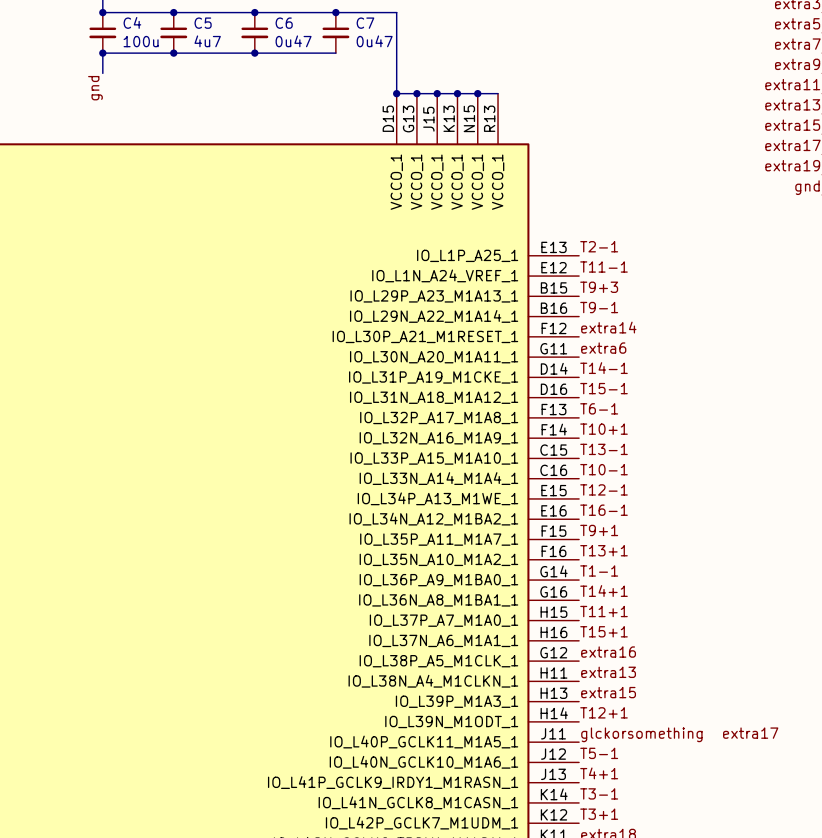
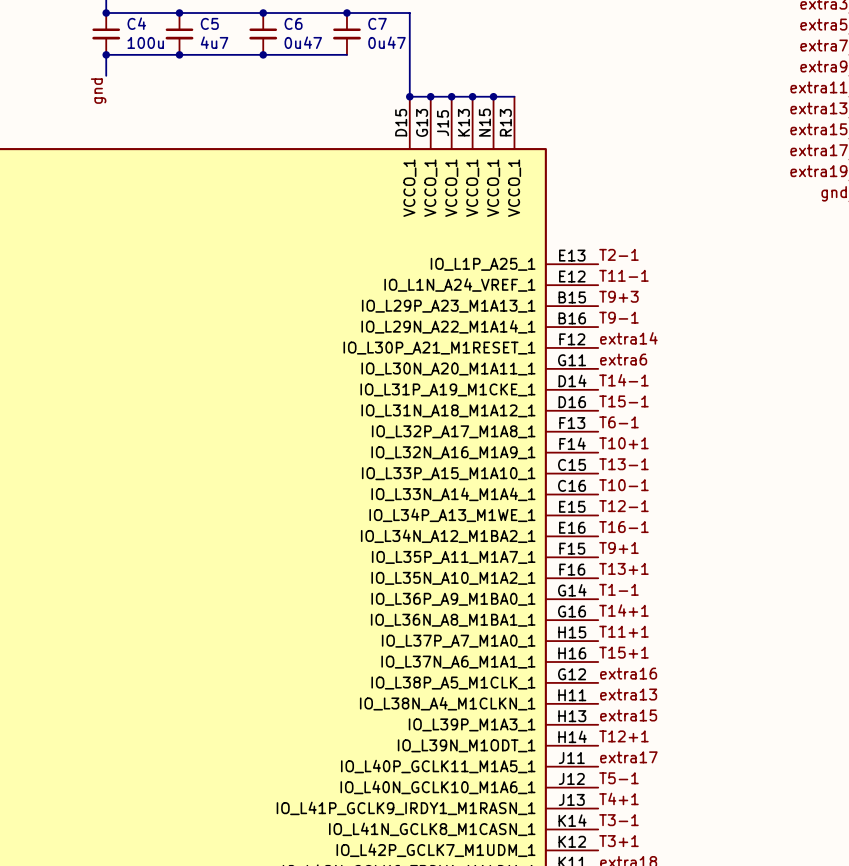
label: extra17 (750, 733) -> none
label: glckorsomething (641, 734) -> extra17 (628, 757)

